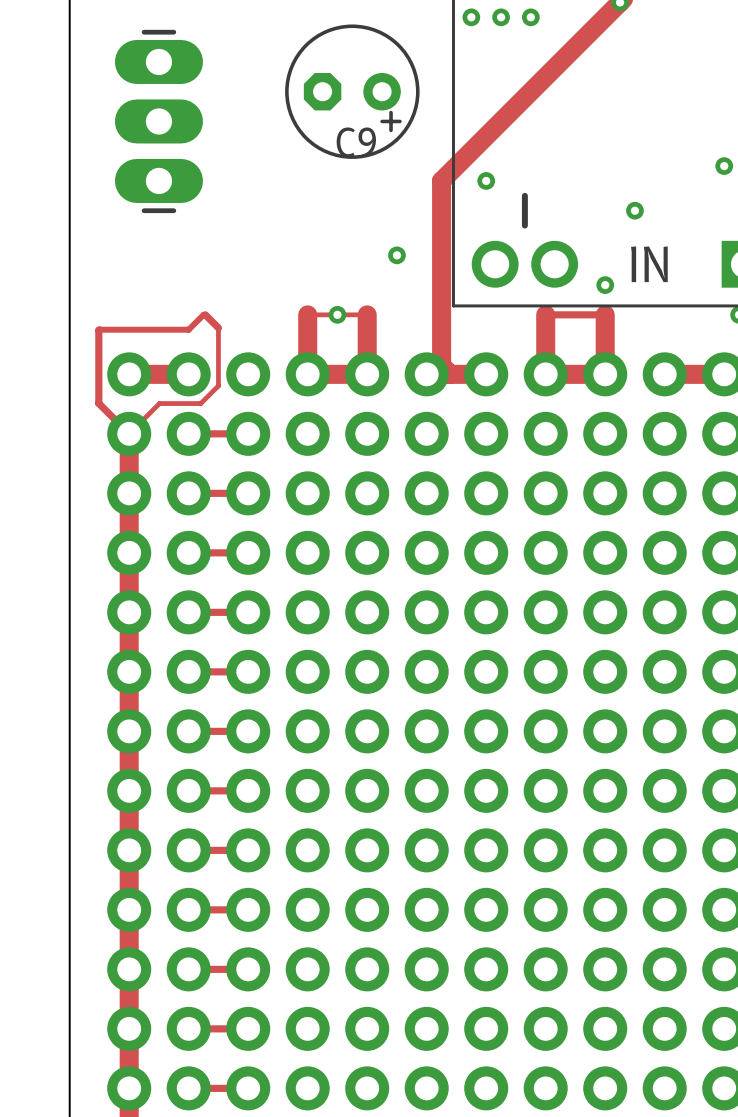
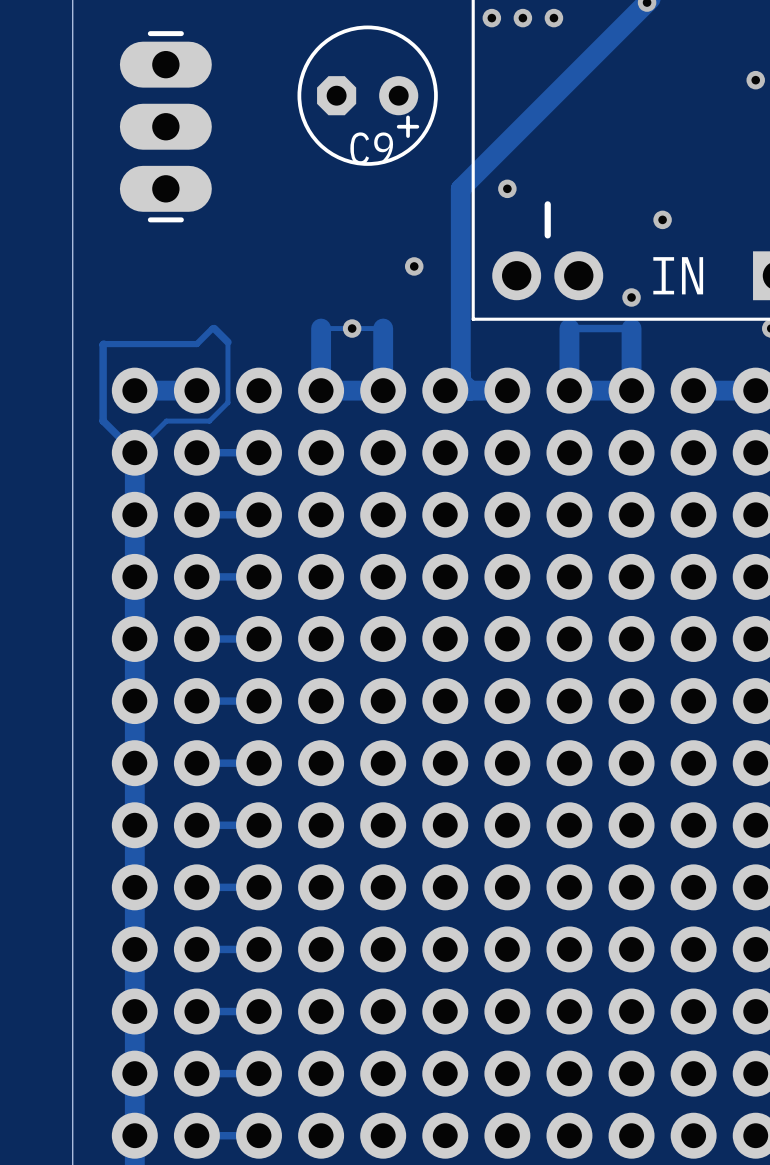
via position: (724, 166) -> (755, 80)

